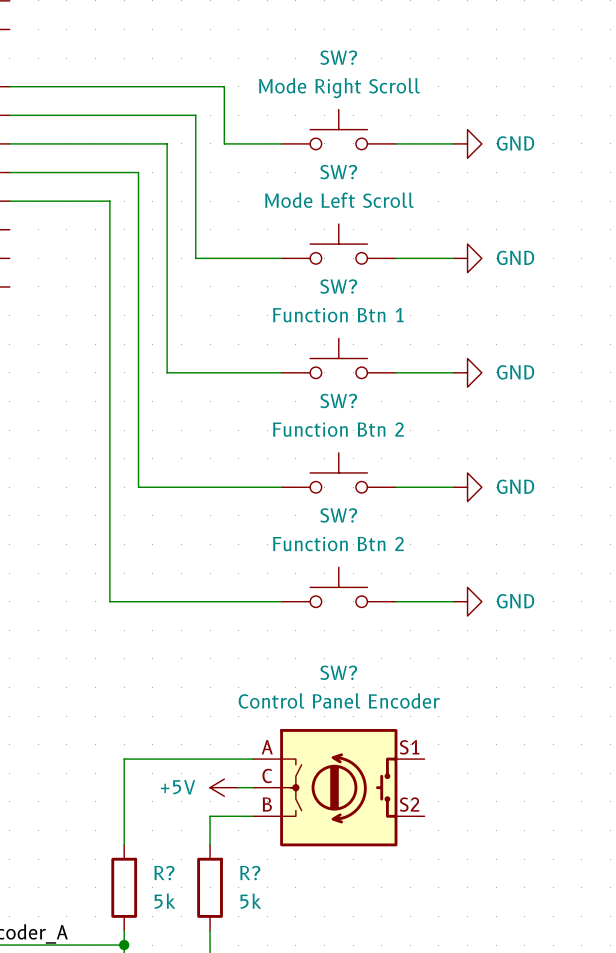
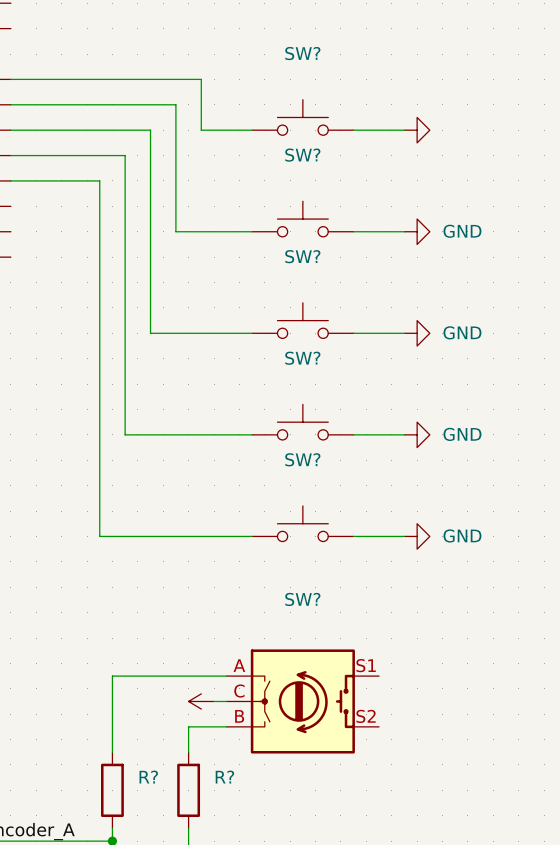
SW? value: Mode Right Scroll (339, 88) -> none
power symbol text: GND (515, 143) -> none
SW? value: Mode Left Scroll (339, 200) -> none
SW? value: Function Btn 1 (338, 315) -> none
SW? value: Function Btn 2 (338, 429) -> none
SW? value: Function Btn 2 (338, 544) -> none
SW? value: Control Panel Encoder (339, 700) -> none
power symbol text: +5V (178, 787) -> none
R? value: 5k (165, 901) -> none
R? value: 5k (250, 901) -> none

